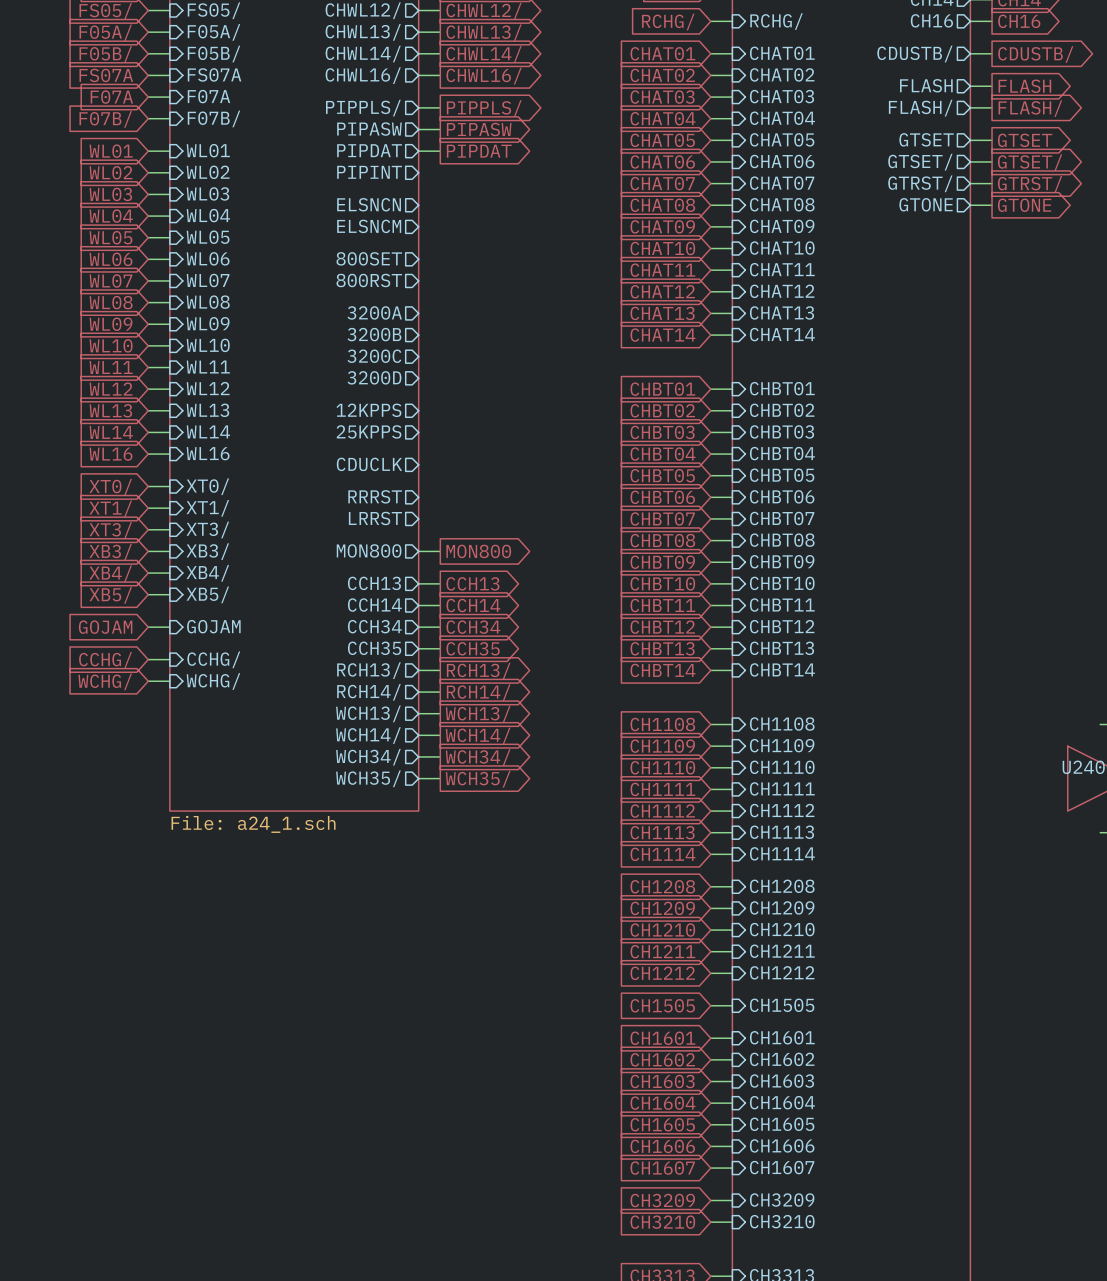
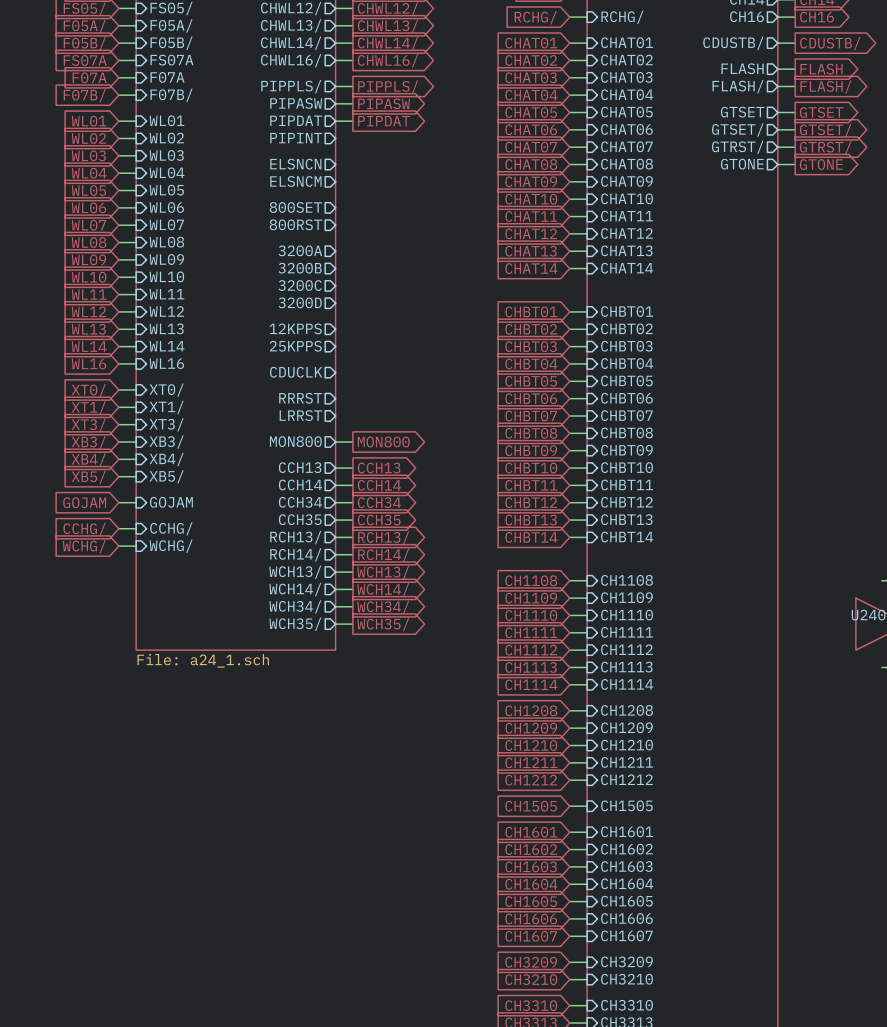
global label: none -> CH3310 (531, 1005)
wire: none -> (569, 1005) (587, 1005)
sheet pin: none -> CH3310 (627, 1005)

